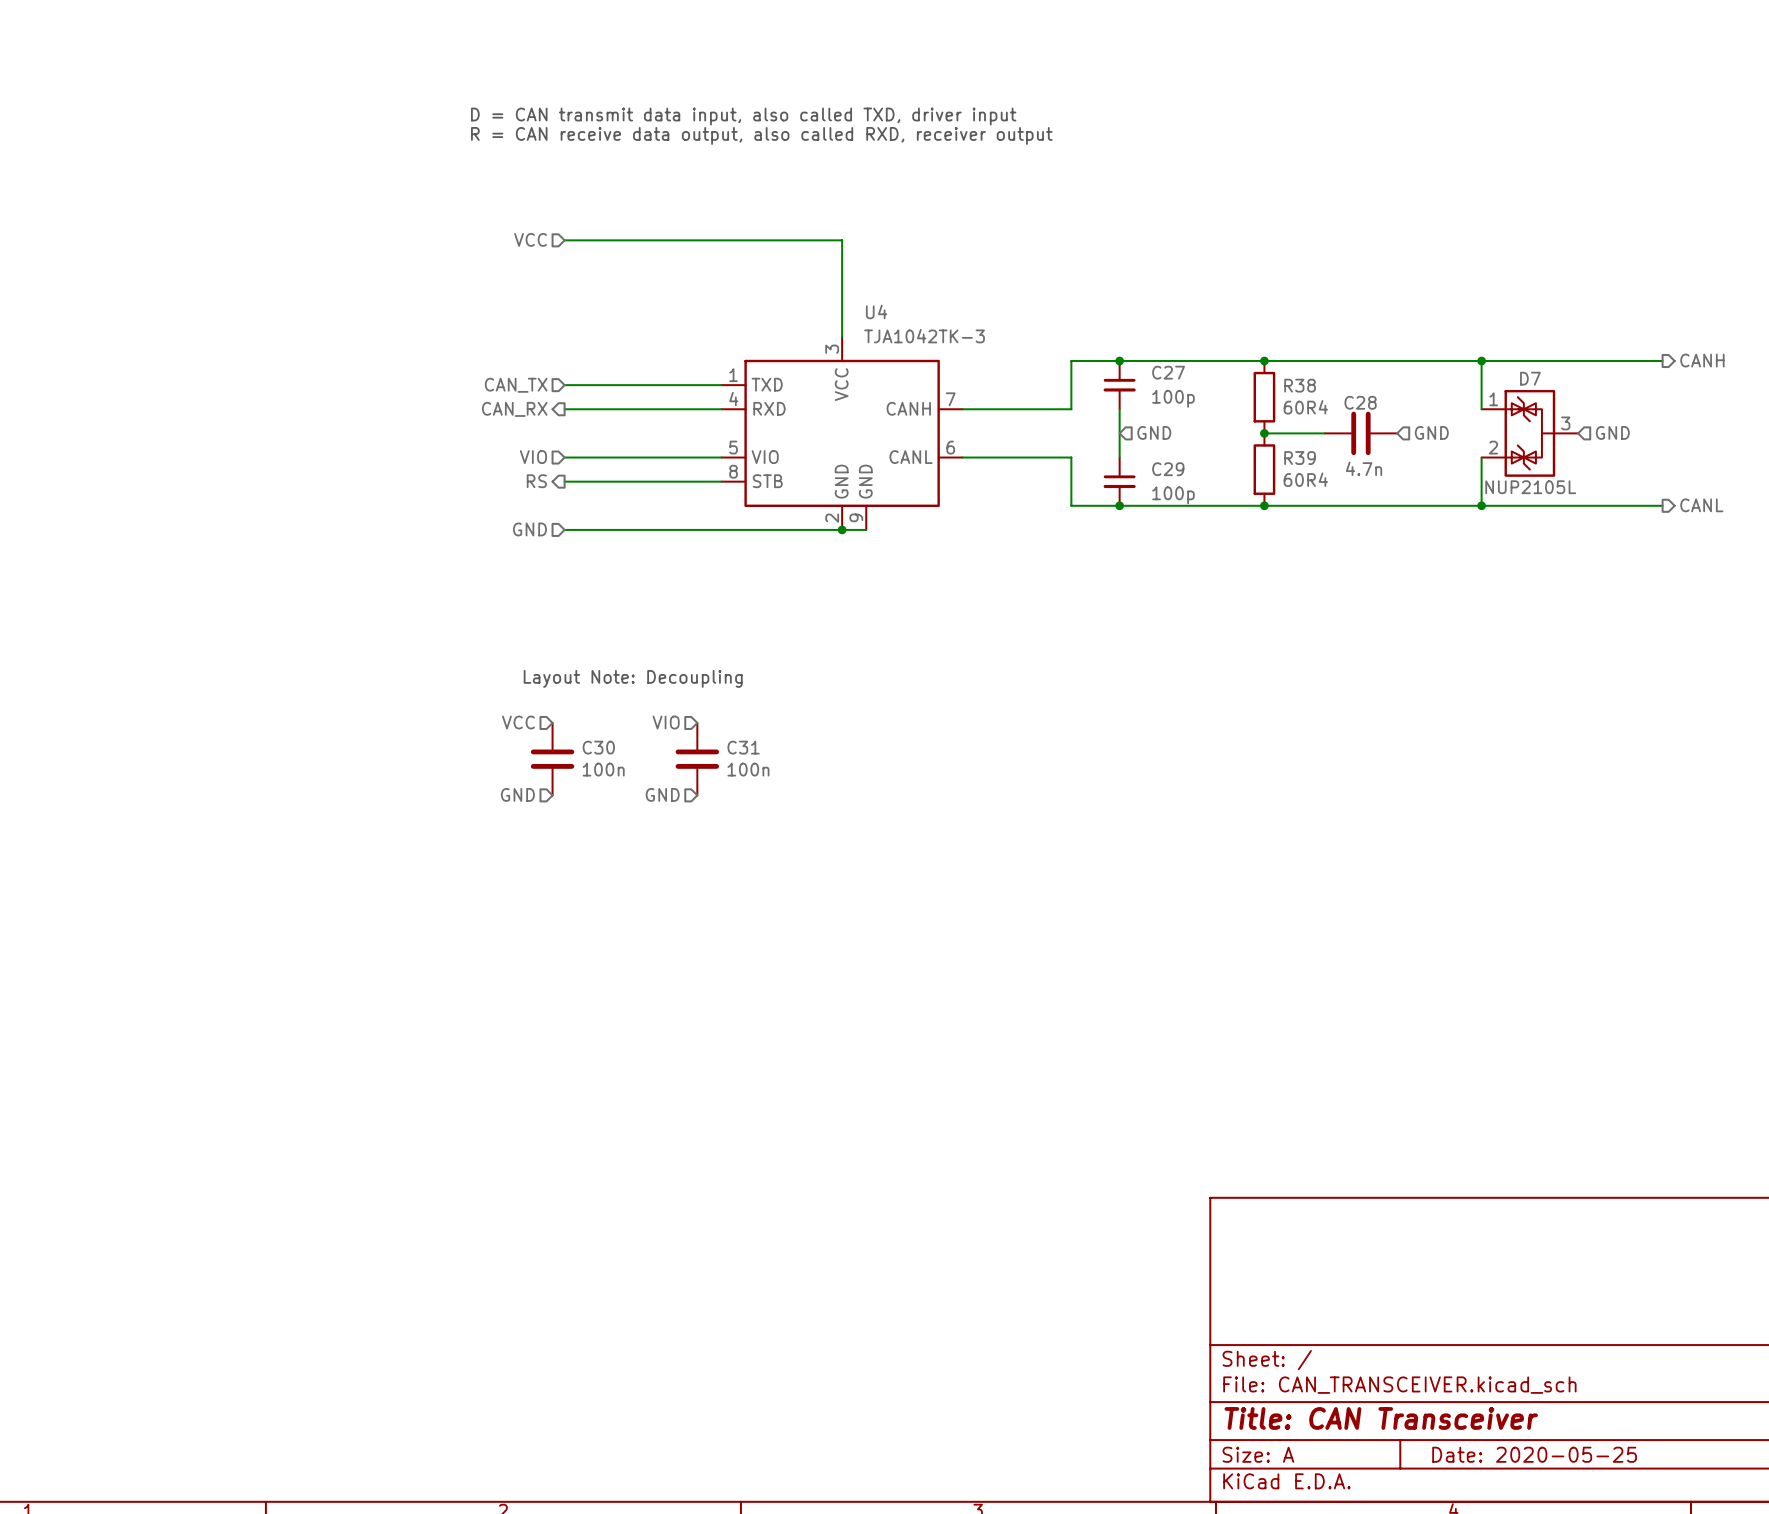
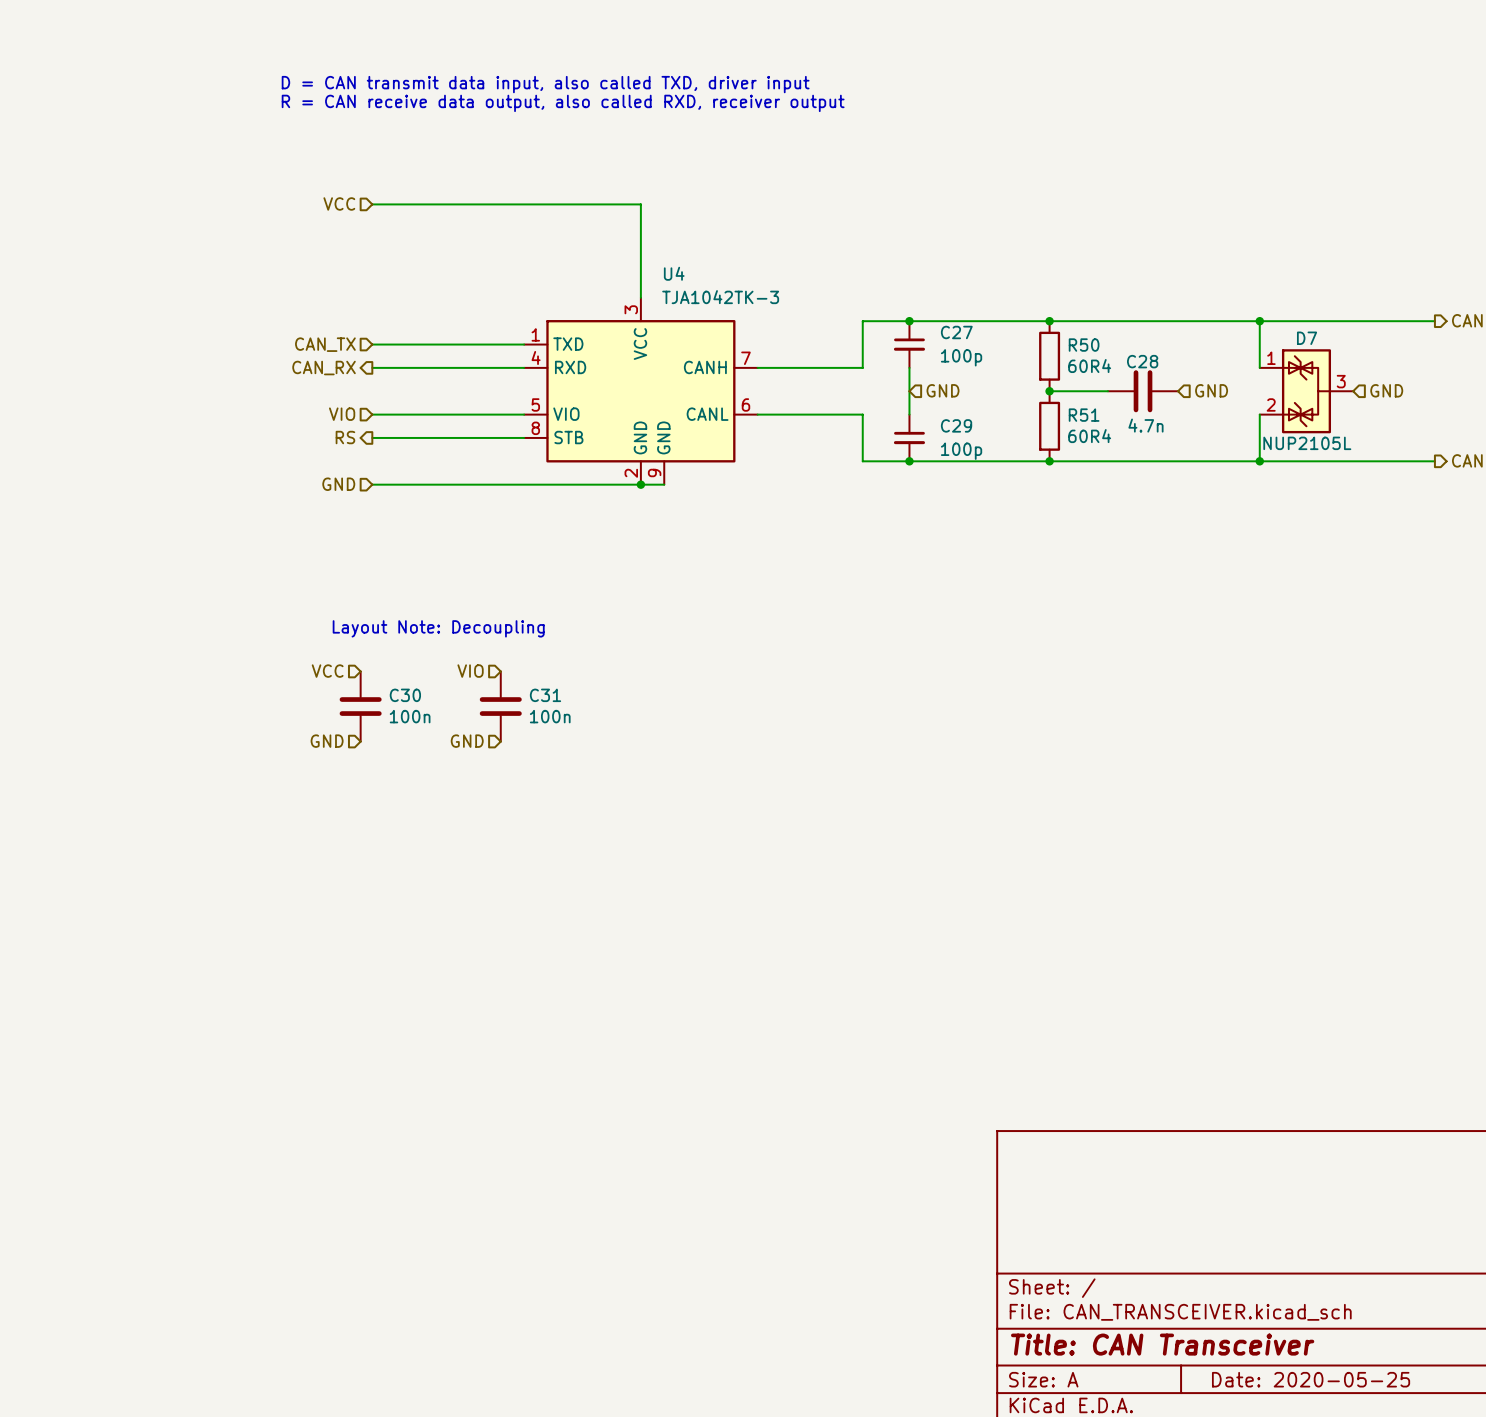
R38 name: R38 (1300, 385) -> R50 (1084, 345)
R39 name: R39 (1300, 458) -> R51 (1084, 415)

